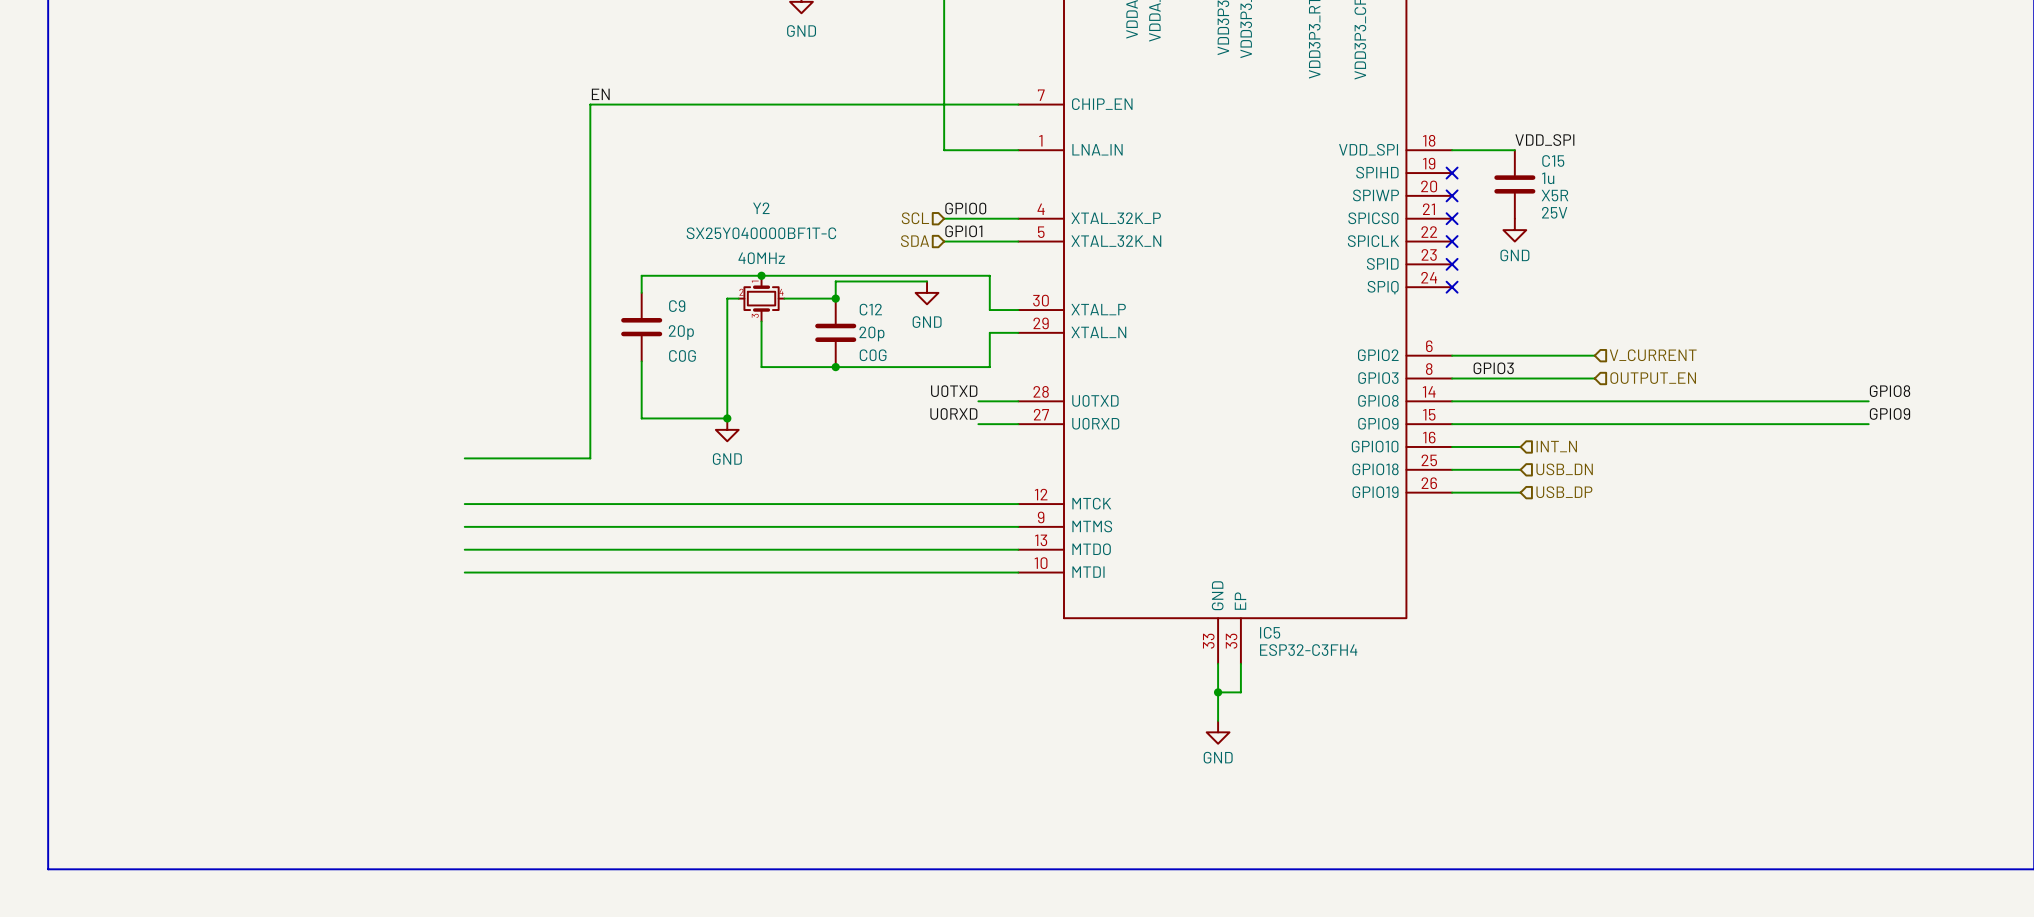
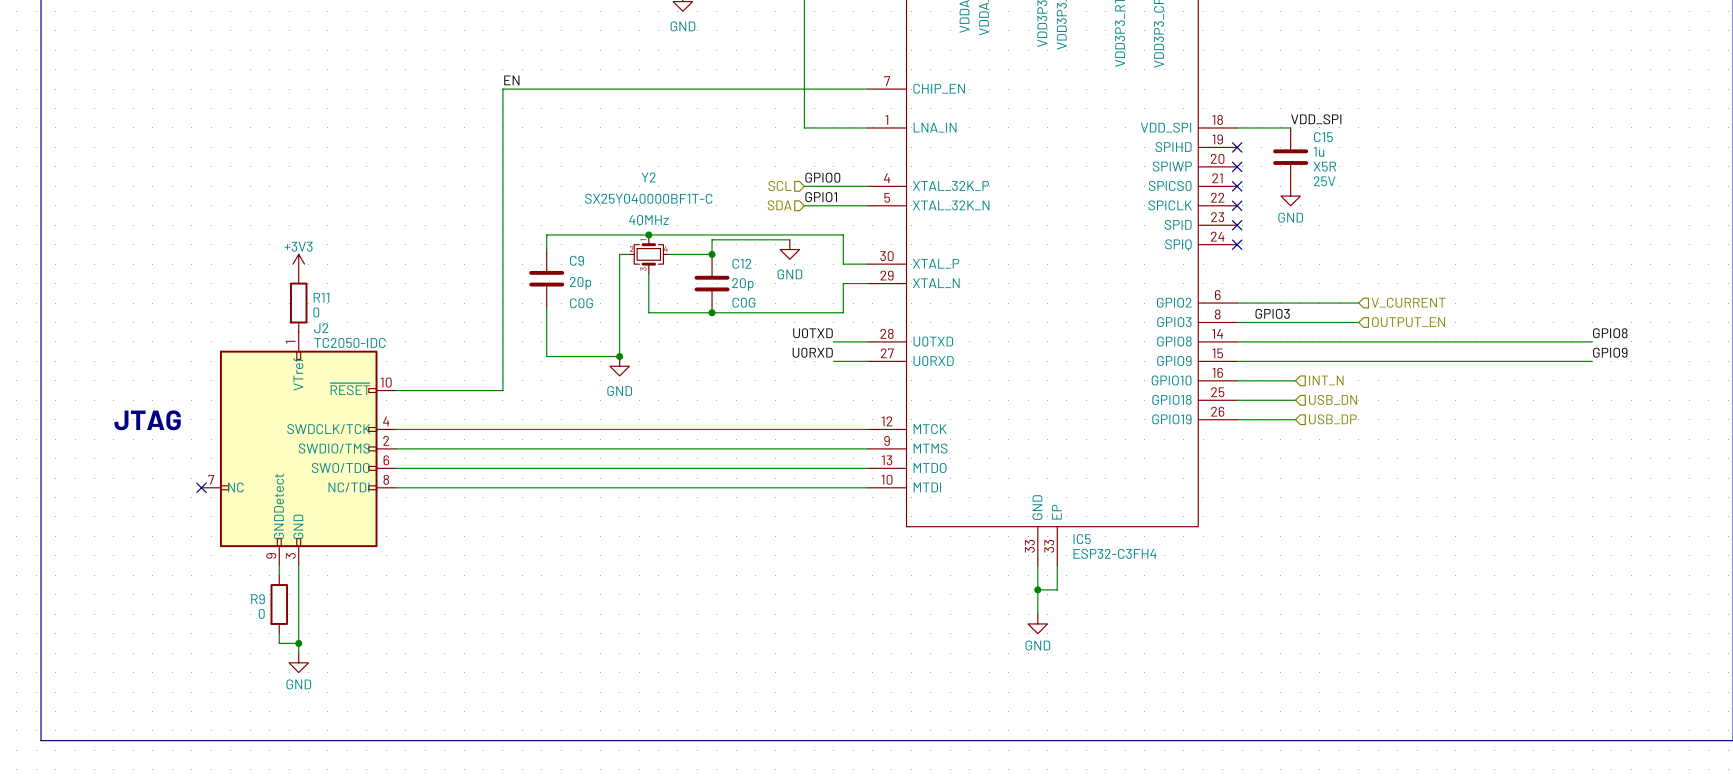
power symbol: none -> +3V3 (298, 264)
R11: none -> 0 (298, 303)
text: none -> JTAG (147, 420)
J2: none -> TC2050-IDC (298, 448)
no-connect mark: none -> (201, 487)
wire: none -> (279, 565) (279, 575)
wire: none -> (298, 565) (298, 653)
R9: none -> 0 (279, 604)
wire: none -> (279, 633) (279, 643) (298, 643)
junction: none -> (298, 643)
power symbol: none -> GND (298, 662)

